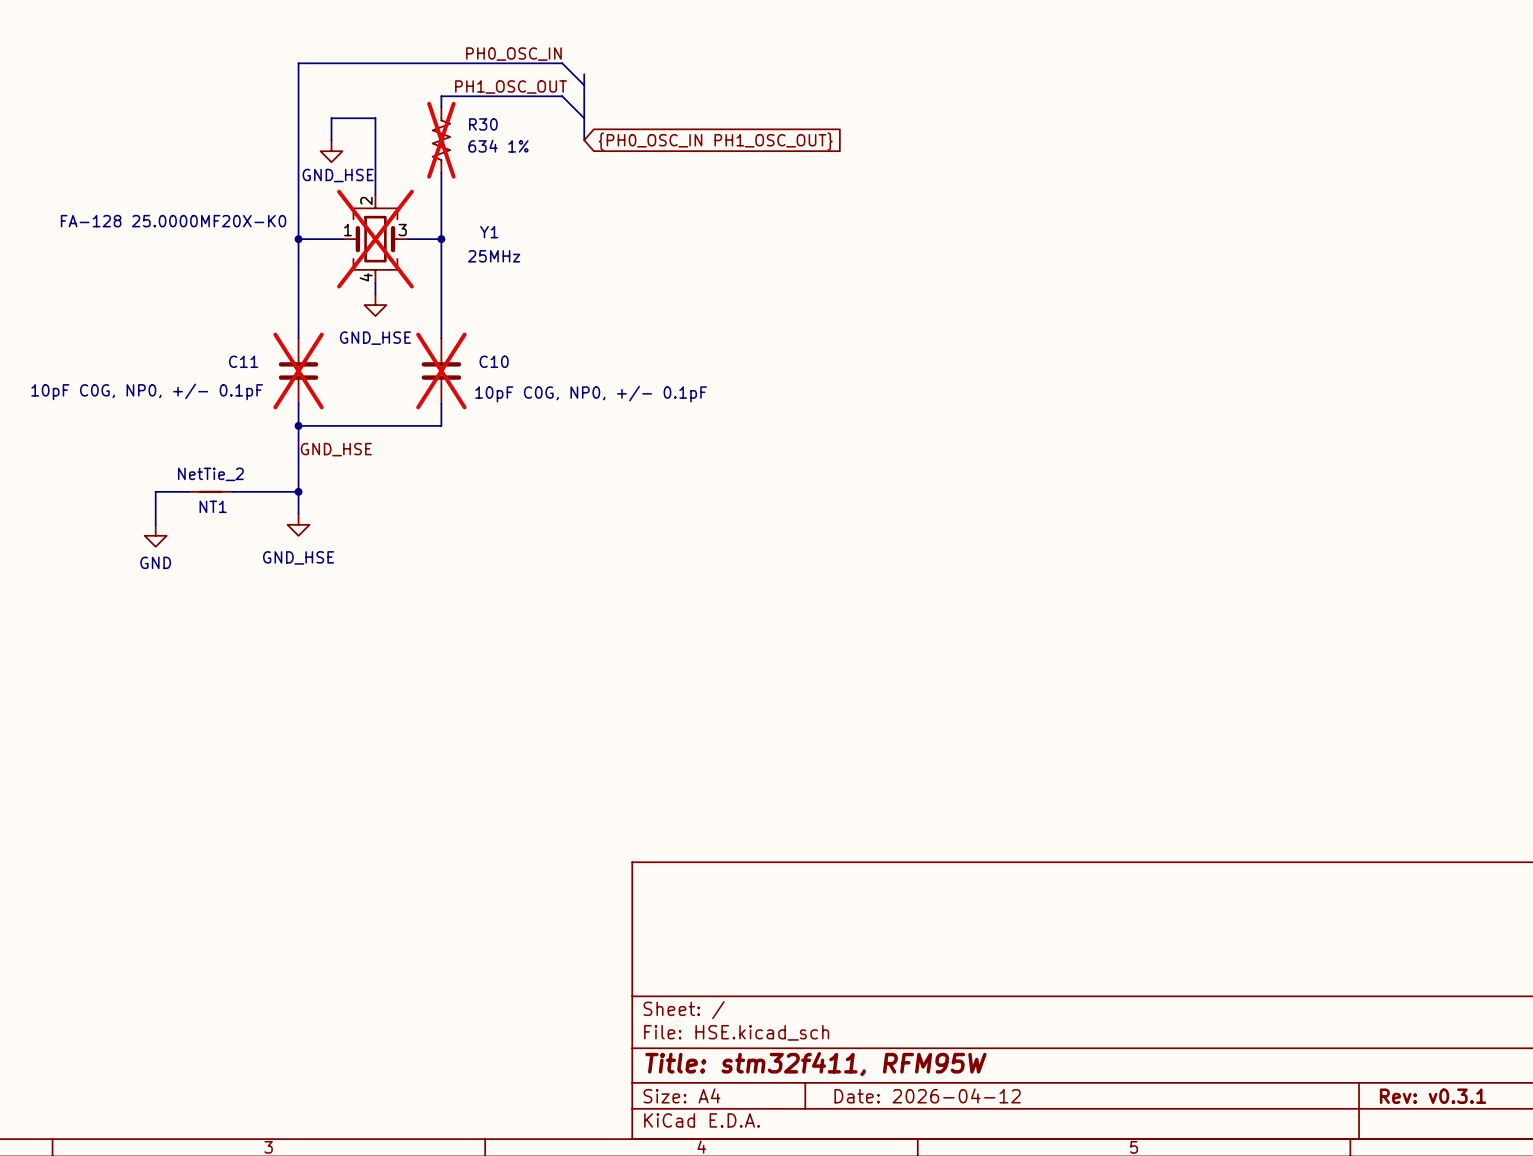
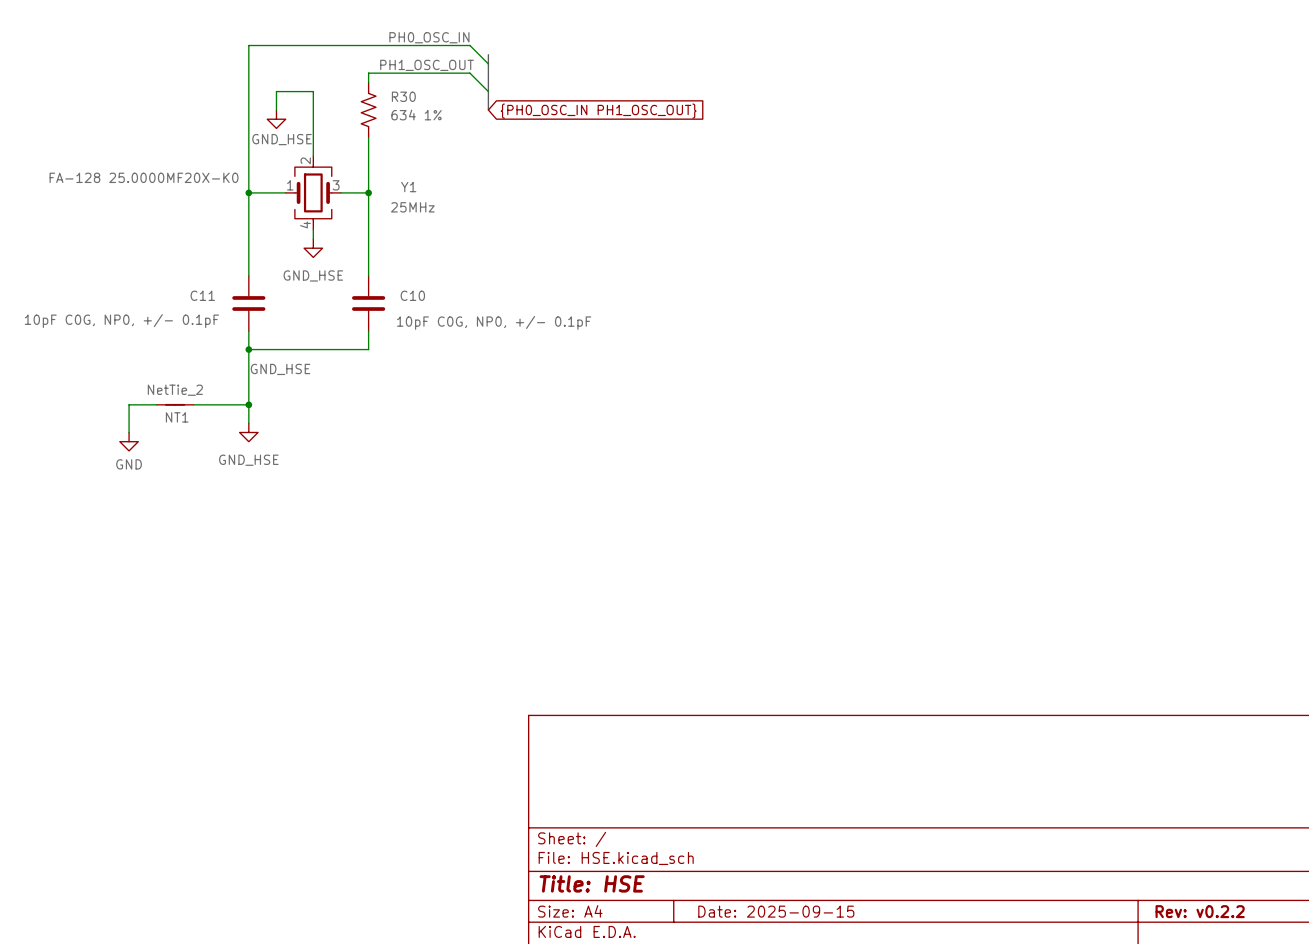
R30 do-not-place cross: (441, 140) -> none
Y1 do-not-place cross: (375, 239) -> none
C11 do-not-place cross: (298, 370) -> none
C10 do-not-place cross: (441, 370) -> none
title block: Title: stm32f411, RFM95W (815, 1064) -> Title: HSE (592, 883)
title block: Date: 2026-04-12 (927, 1095) -> Date: 2025-09-15 (776, 911)
title block: Rev: v0.3.1 (1433, 1096) -> Rev: v0.2.2 (1200, 911)

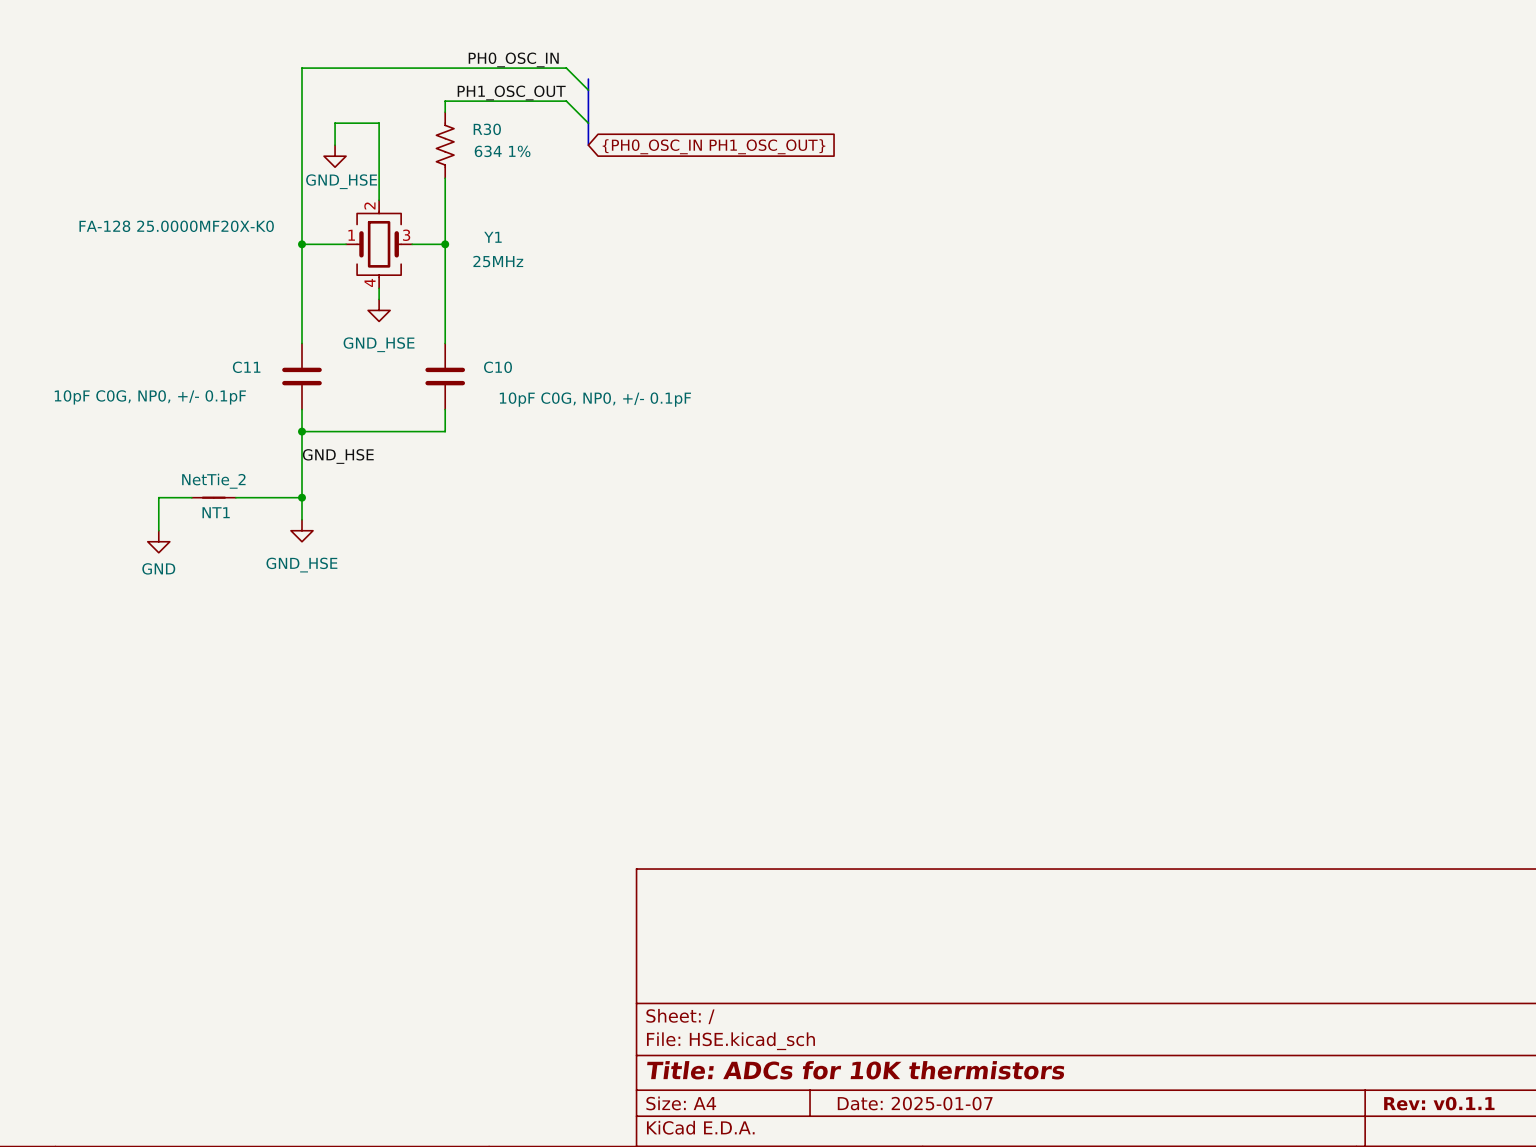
title block: Title: HSE (592, 883) -> Title: ADCs for 10K thermistors (855, 1070)
title block: Date: 2025-09-15 (776, 911) -> Date: 2025-01-07 (915, 1103)
title block: Rev: v0.2.2 (1200, 911) -> Rev: v0.1.1 (1439, 1103)

